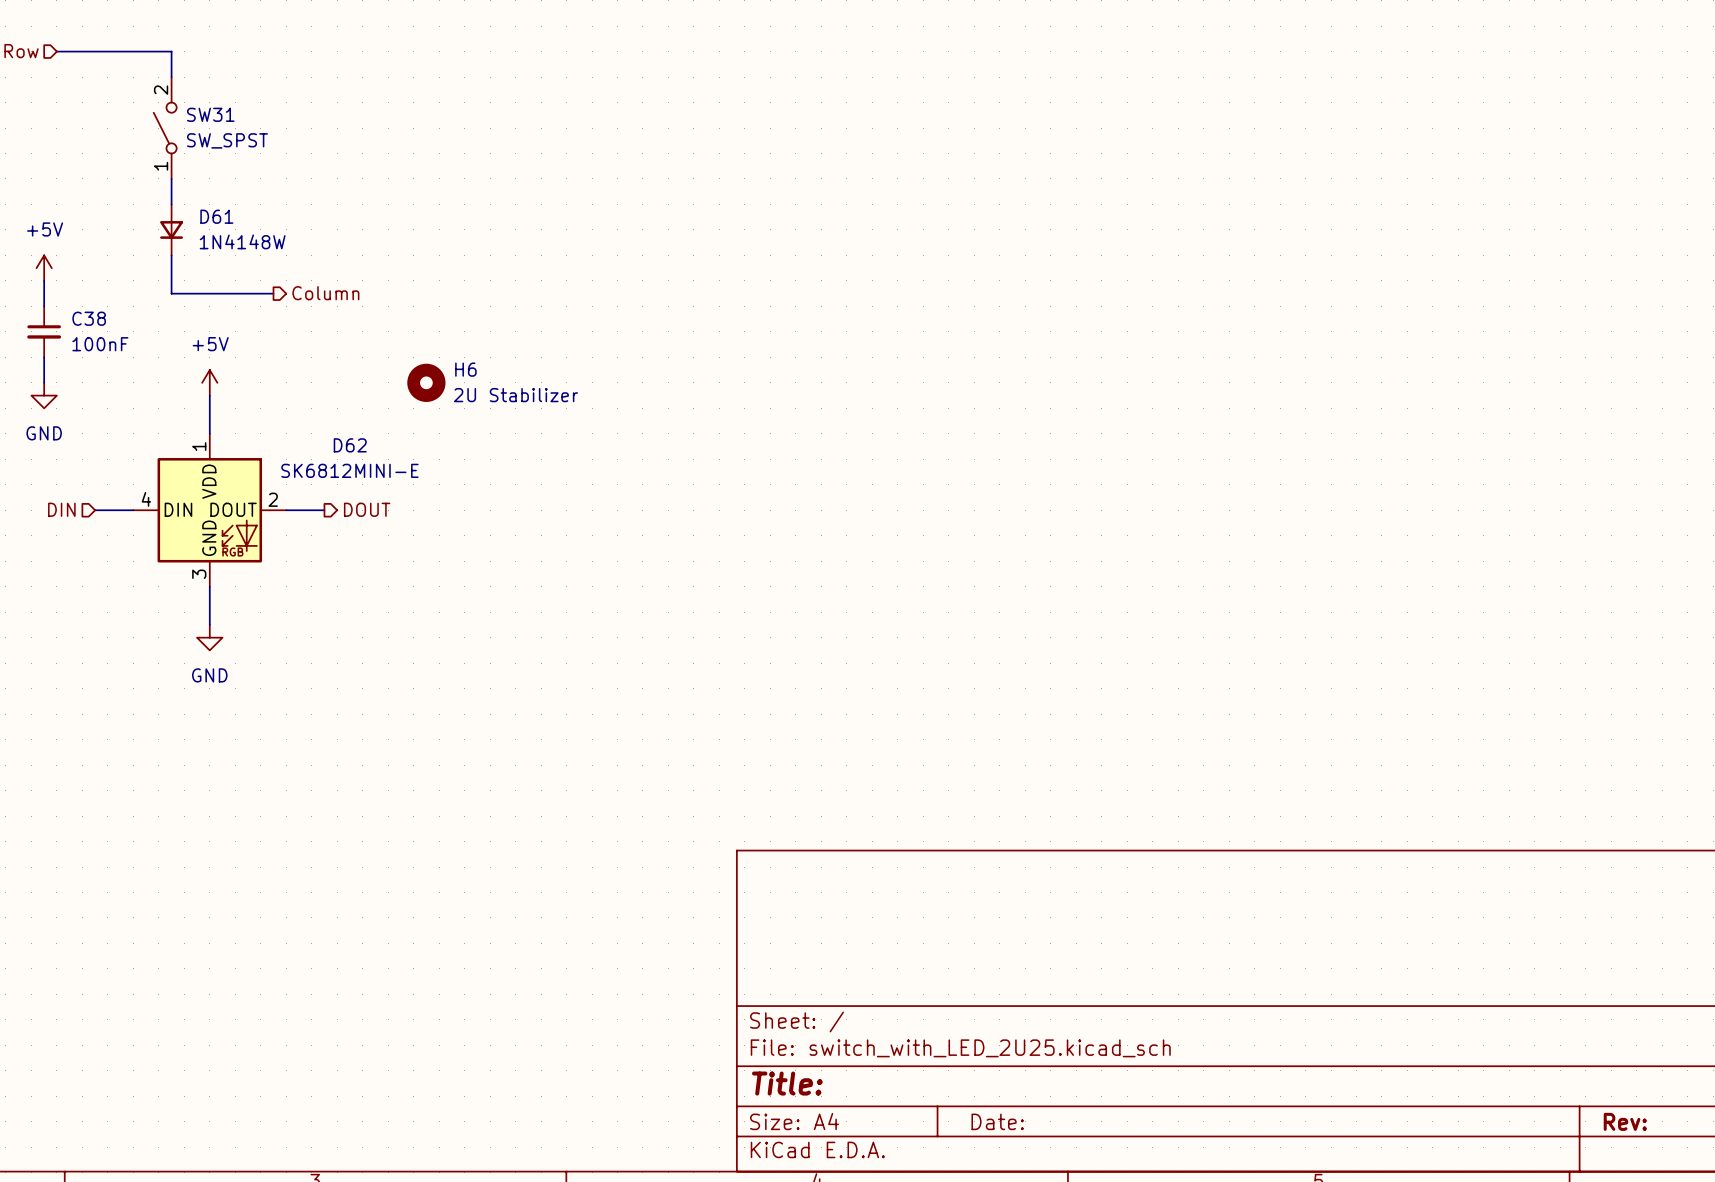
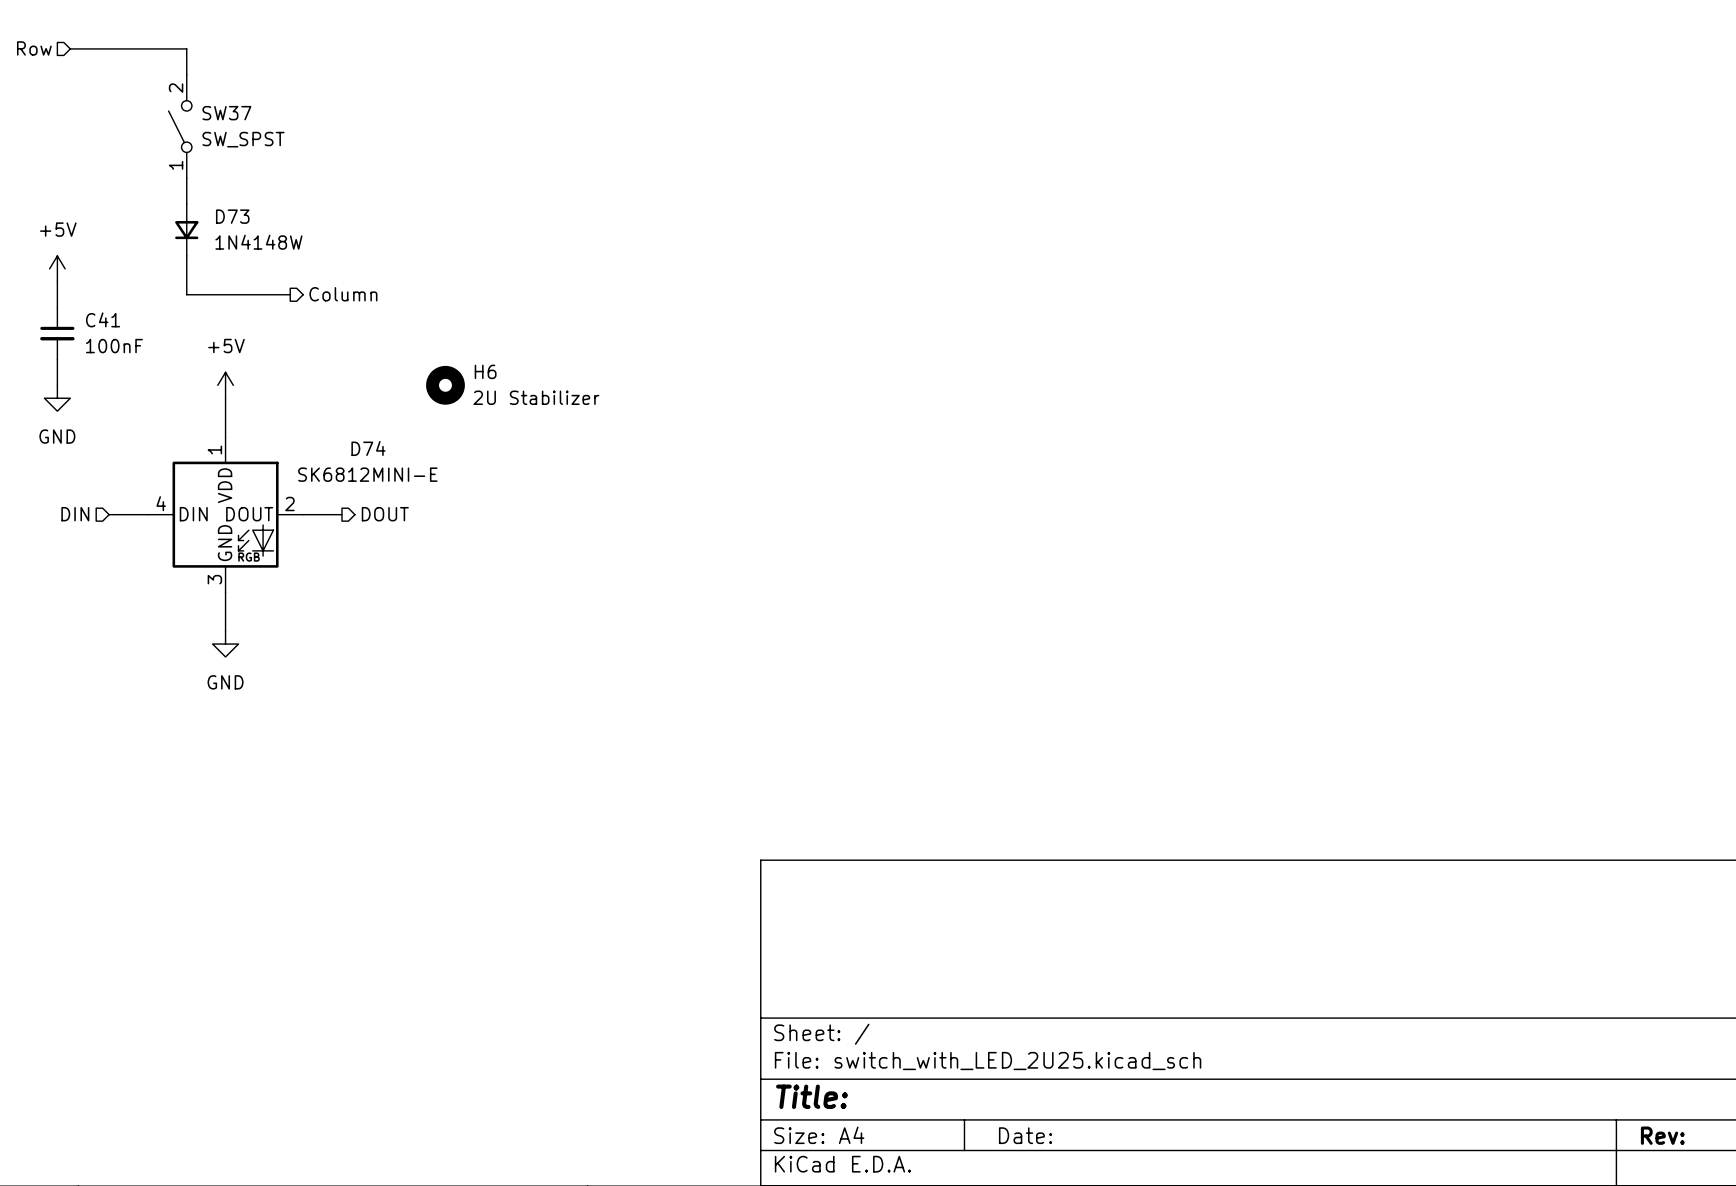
SW31 name: SW31 (210, 114) -> SW37 (226, 113)
D61 name: D61 (216, 216) -> D73 (232, 216)
C38 name: C38 (89, 318) -> C41 (103, 319)
D62 name: D62 (350, 445) -> D74 (368, 448)

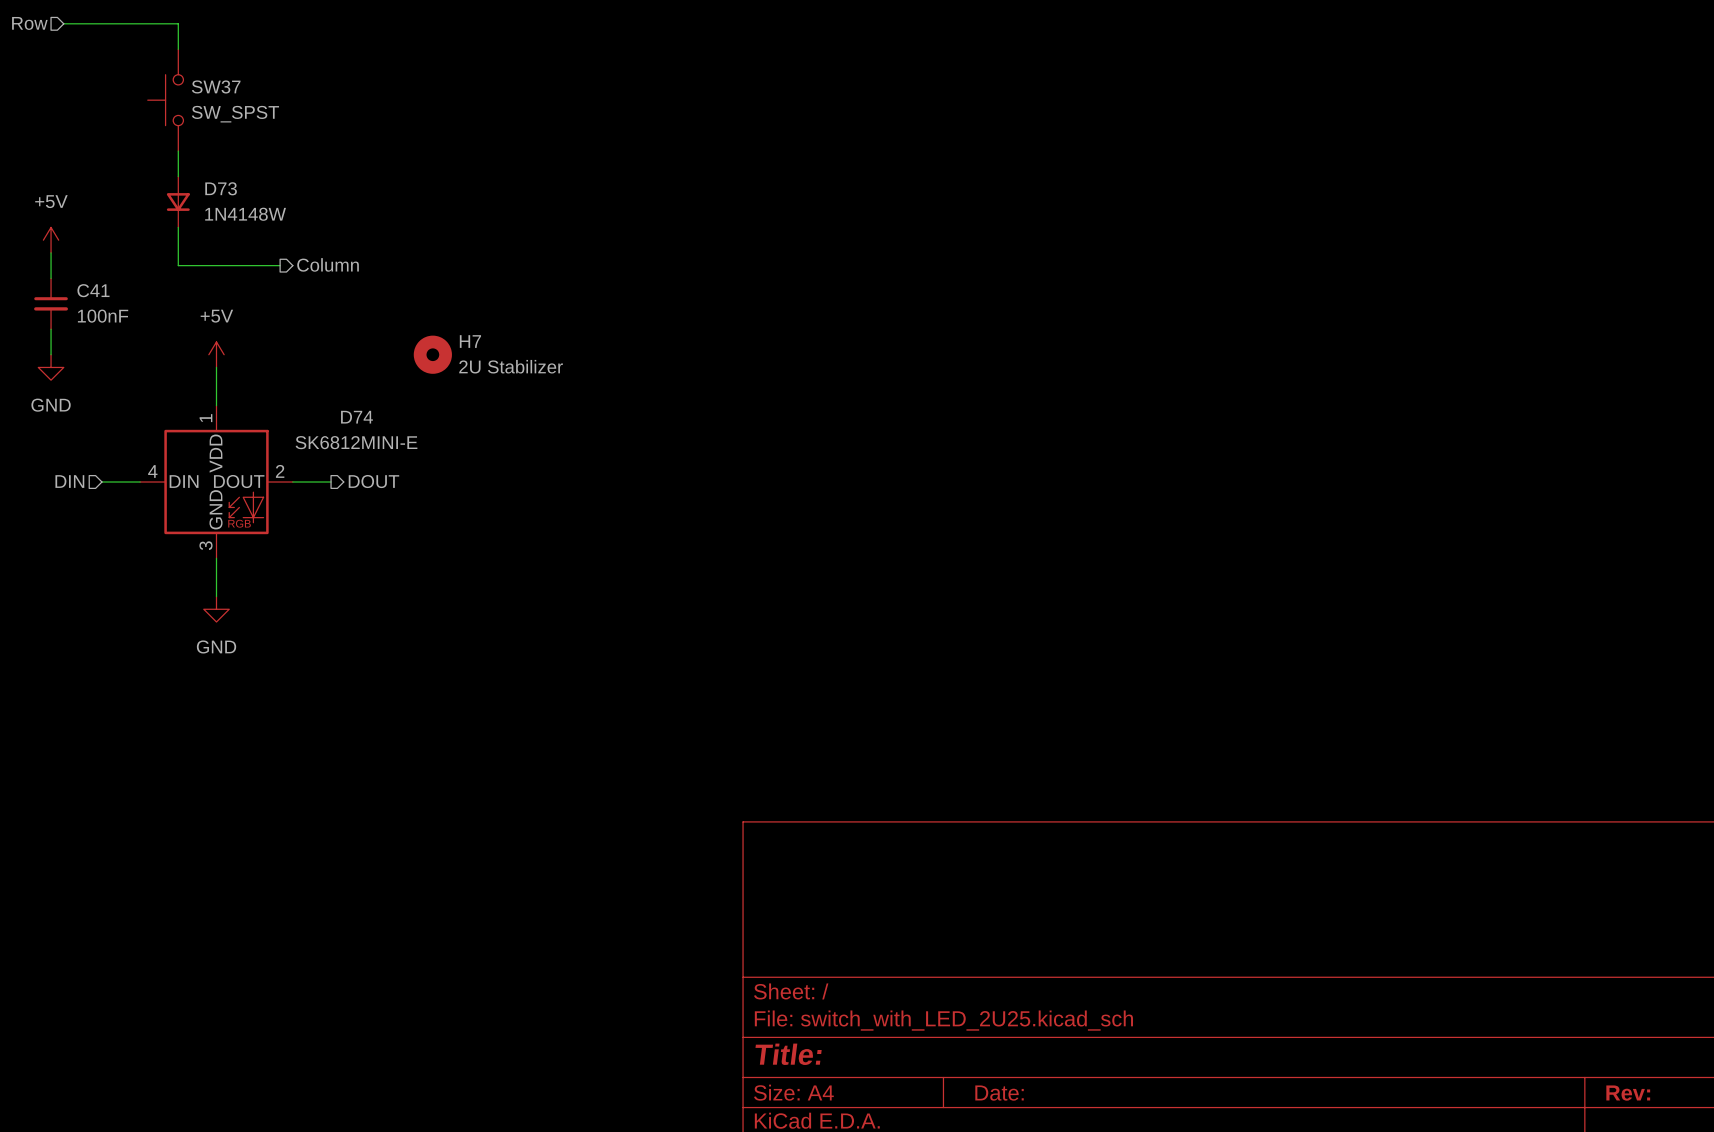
SW37 symbol: [168, 74, 192, 179] -> [147, 49, 184, 152]
H6 name: H6 (485, 371) -> H7 (470, 341)

